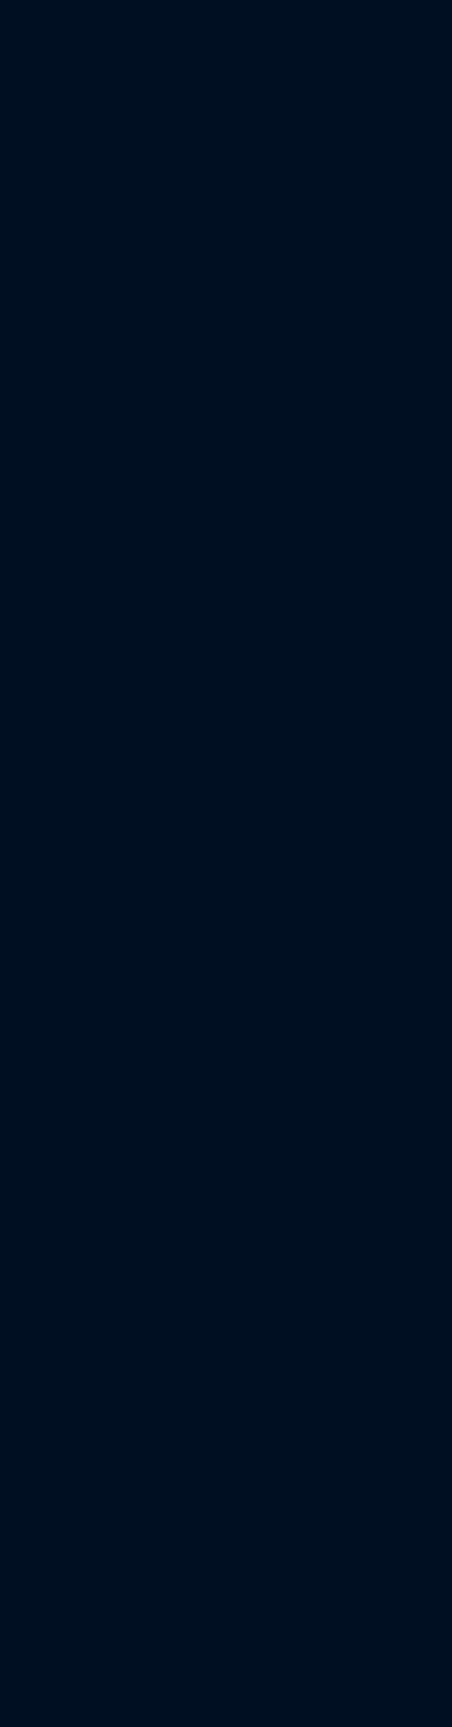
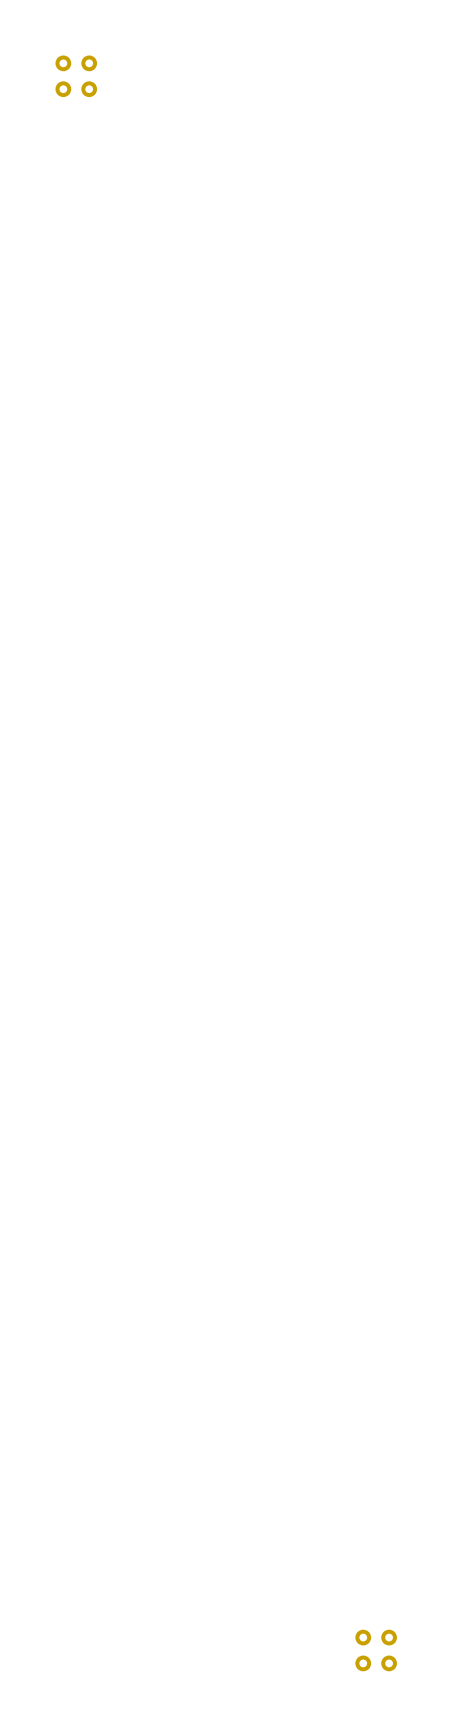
part: none -> (76, 76)
part: none -> (376, 1650)

